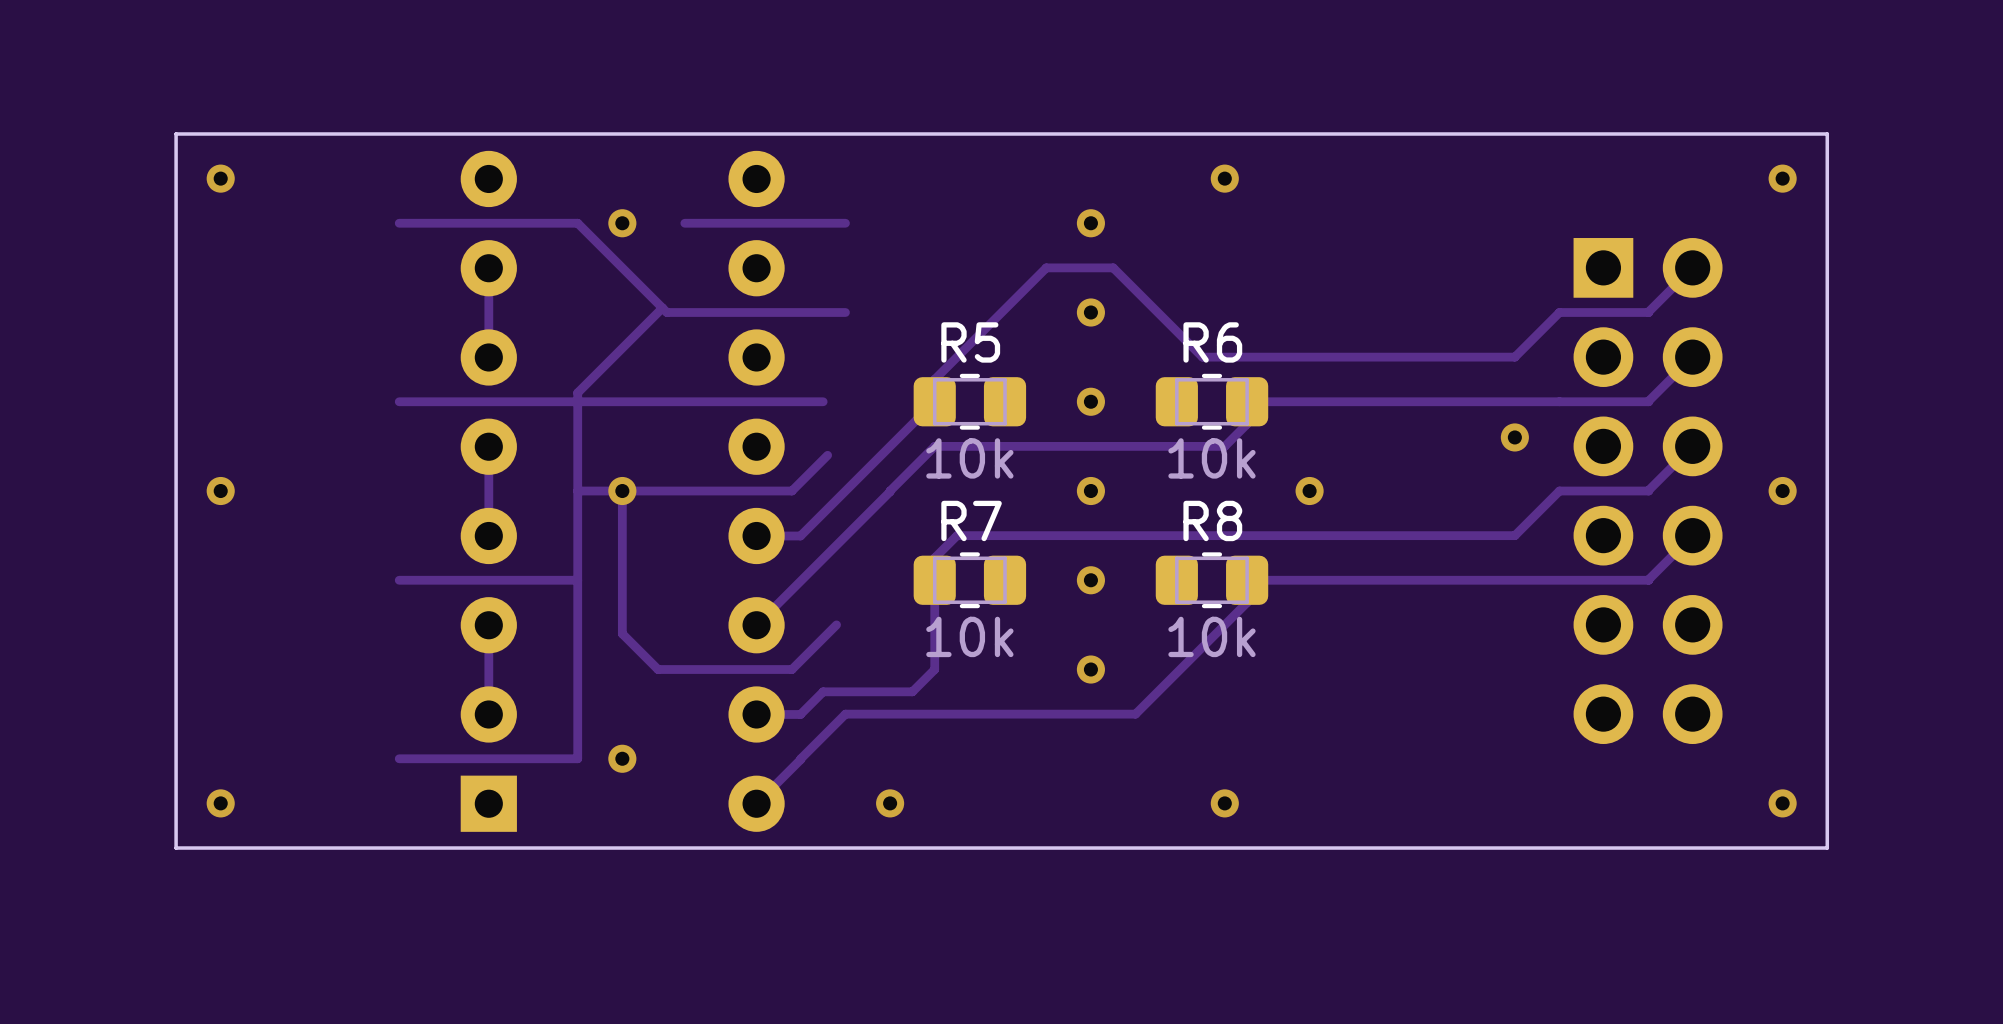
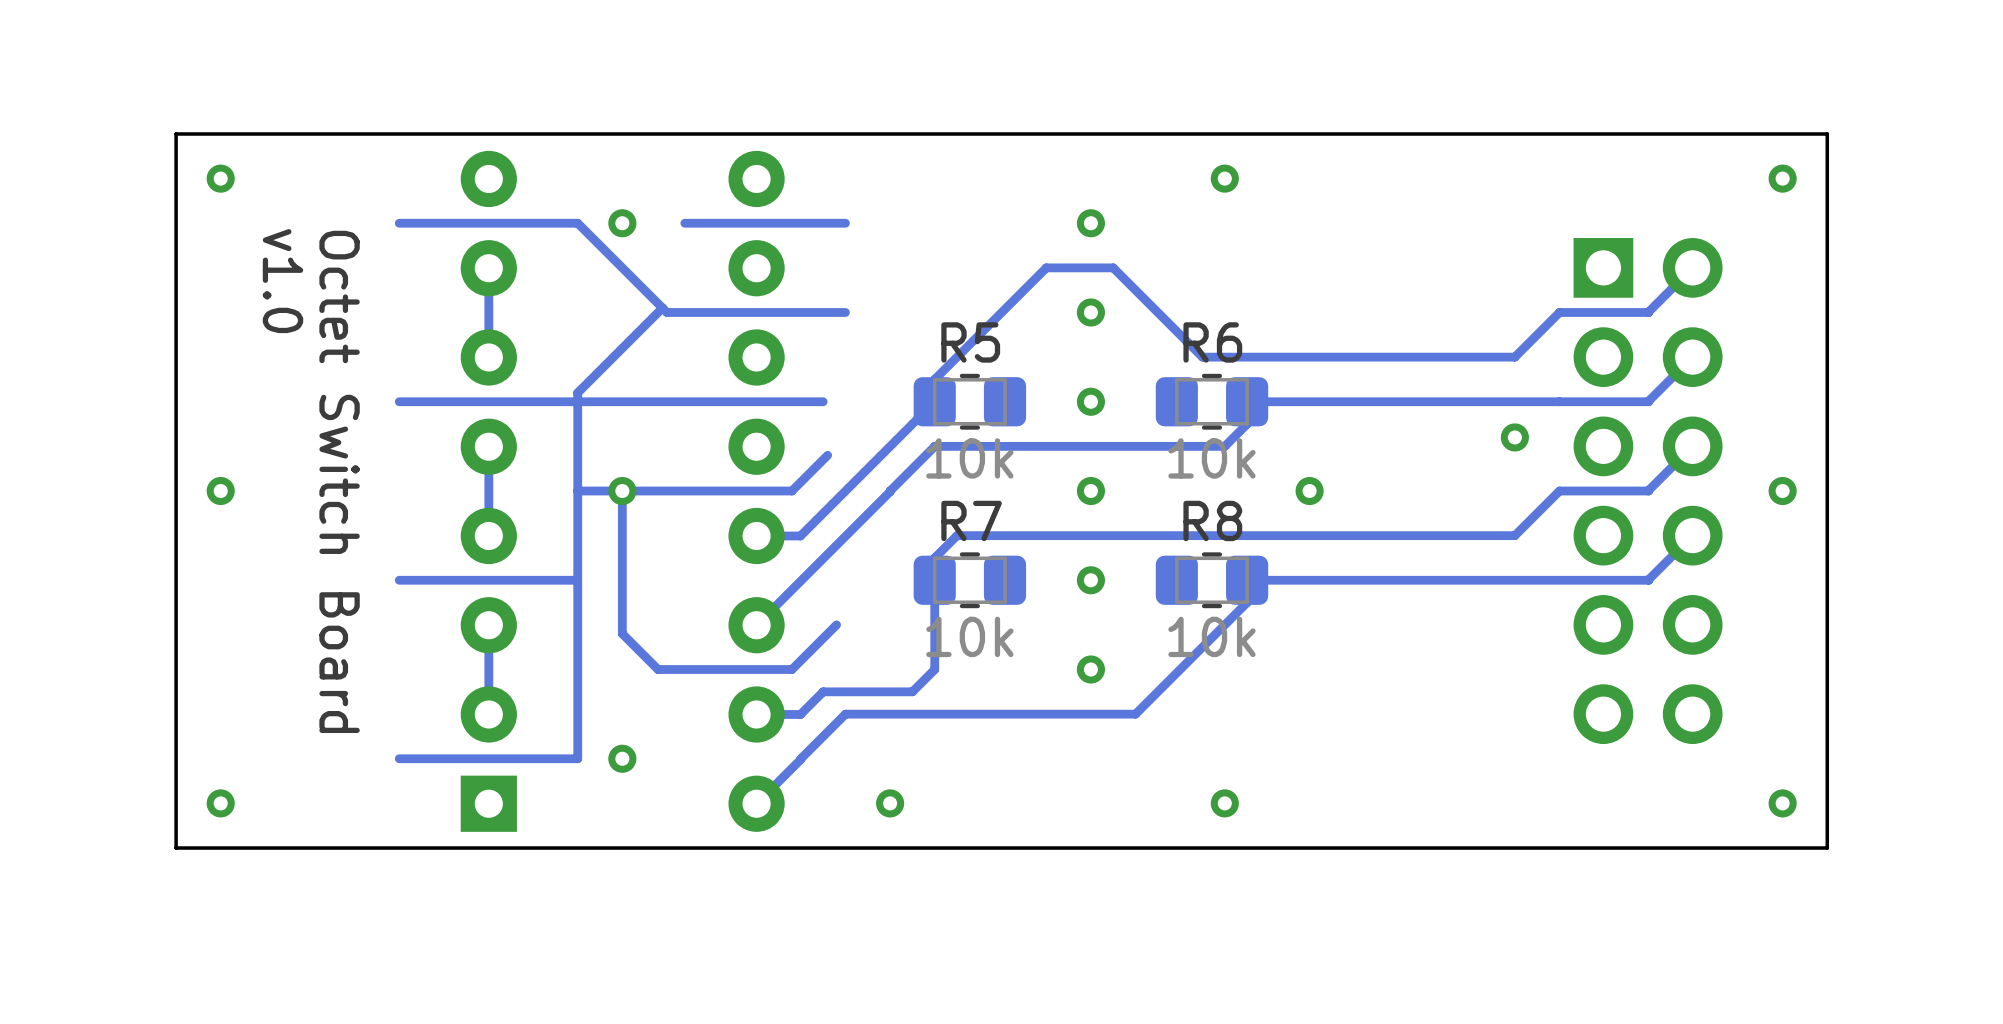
text: none -> v1.0 (282, 281)
text: none -> Octet Switch Board (339, 481)

